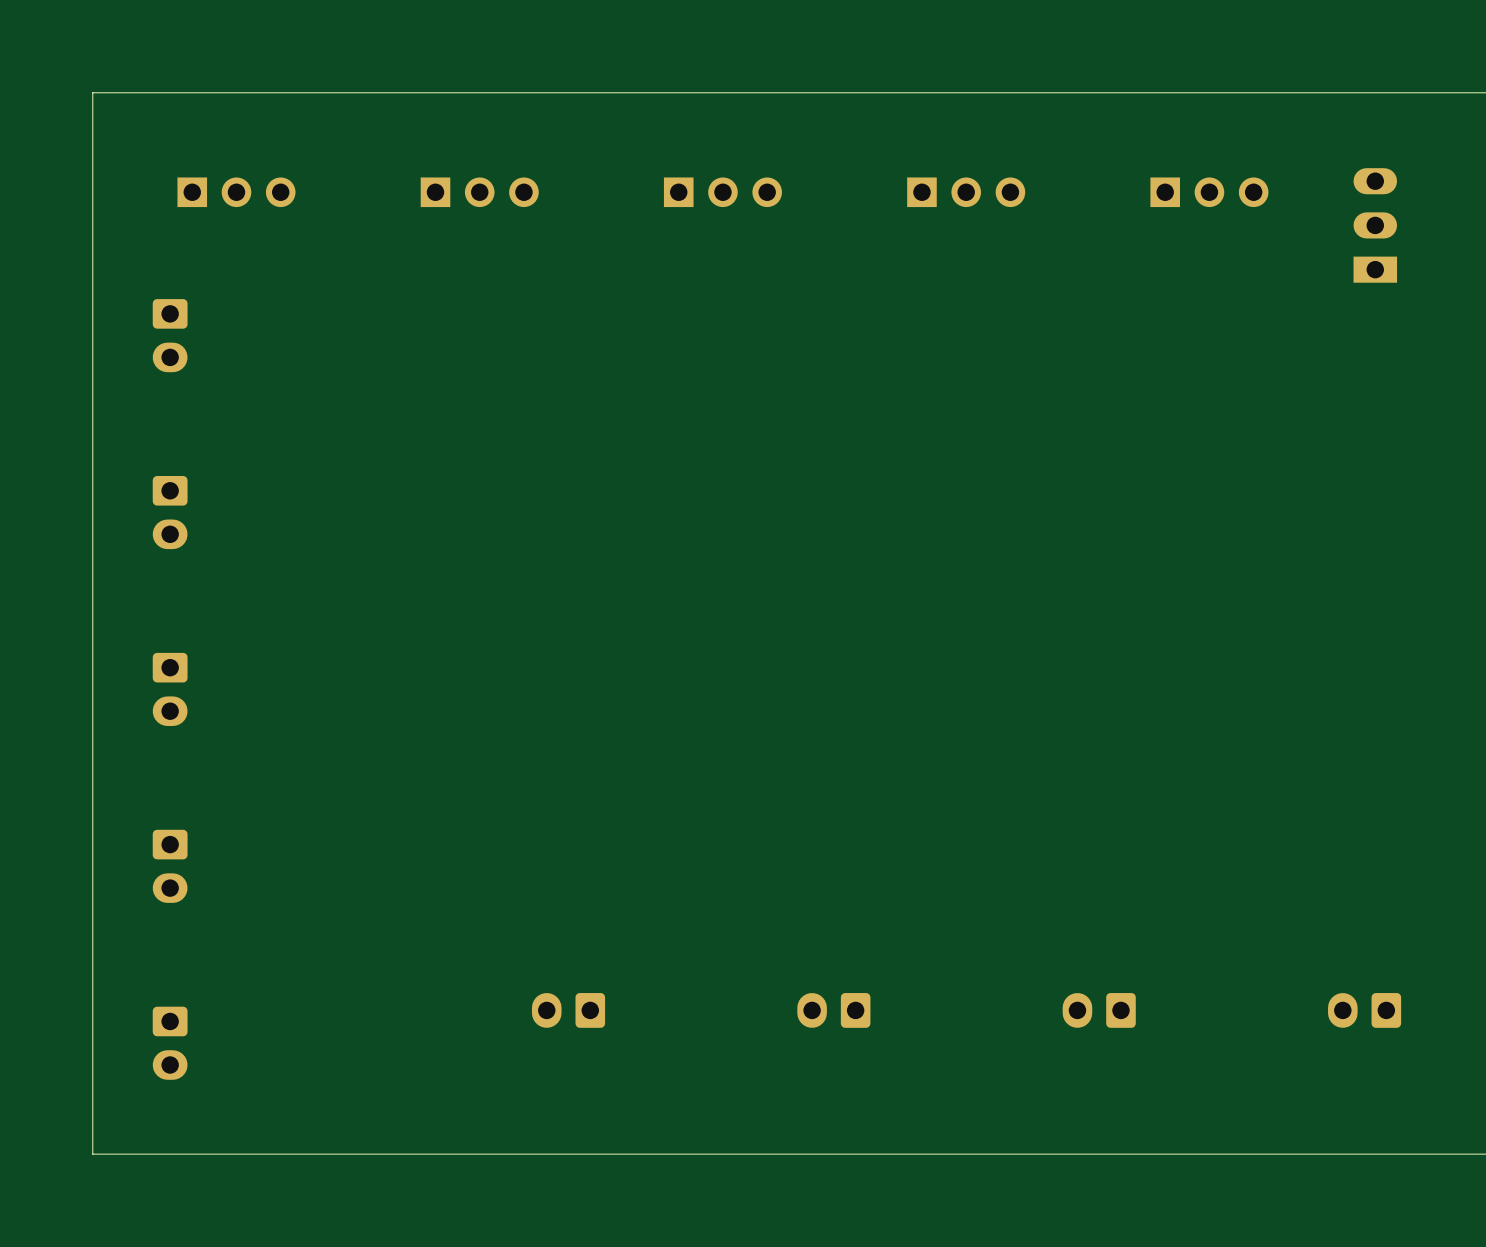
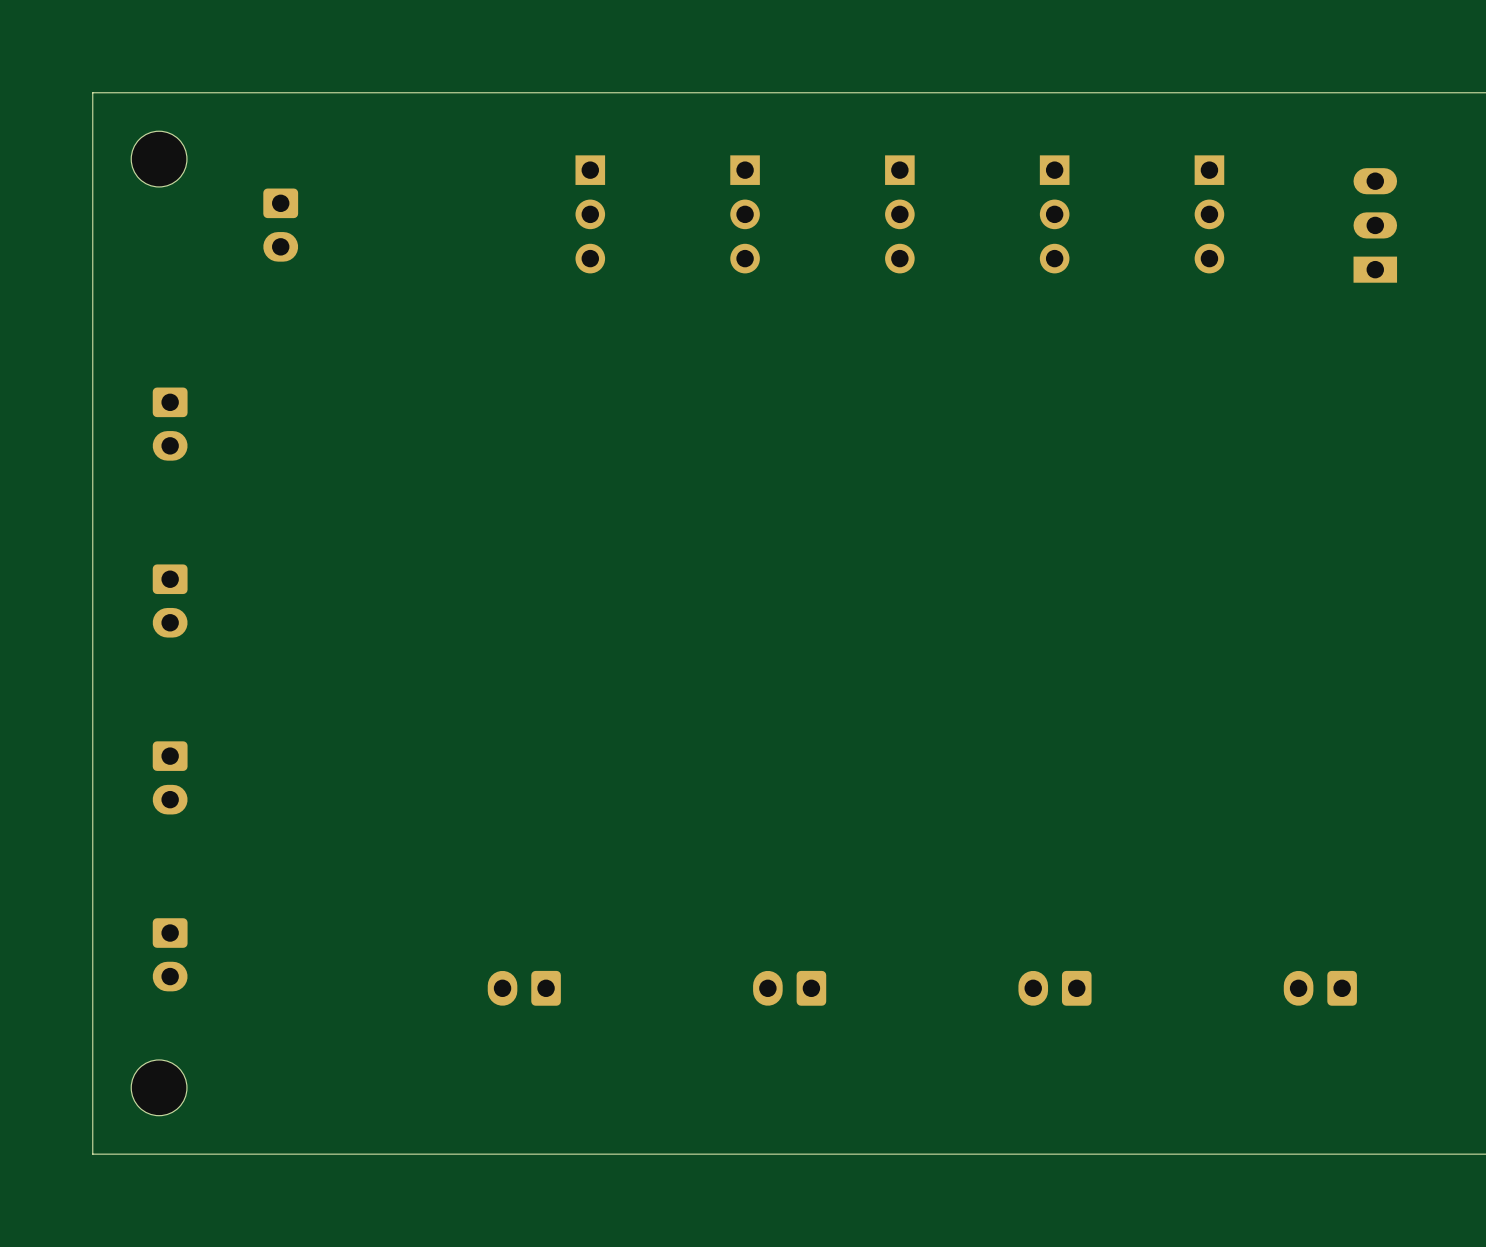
part: none -> (159, 159)
part: (236, 192) -> none
part: (479, 192) -> none
part rotation: 0° (722, 192) -> 90° clockwise (745, 214)
part: (966, 192) -> none
part rotation: 0° (1209, 192) -> 90° clockwise (1209, 214)
part: none -> (590, 214)
part: none -> (899, 214)
part: none -> (1054, 214)
part: none -> (280, 225)
part: (170, 335) -> none
part: none -> (170, 424)
part: (170, 512) -> none
part: none -> (170, 600)
part: (170, 689) -> none
part: none -> (170, 777)
part: (170, 866) -> none
part: none -> (170, 954)
part position: (568, 1010) -> (524, 988)
part position: (833, 1010) -> (789, 988)
part position: (1099, 1010) -> (1055, 988)
part position: (1364, 1010) -> (1320, 988)
part: (170, 1043) -> none
part: none -> (159, 1087)

